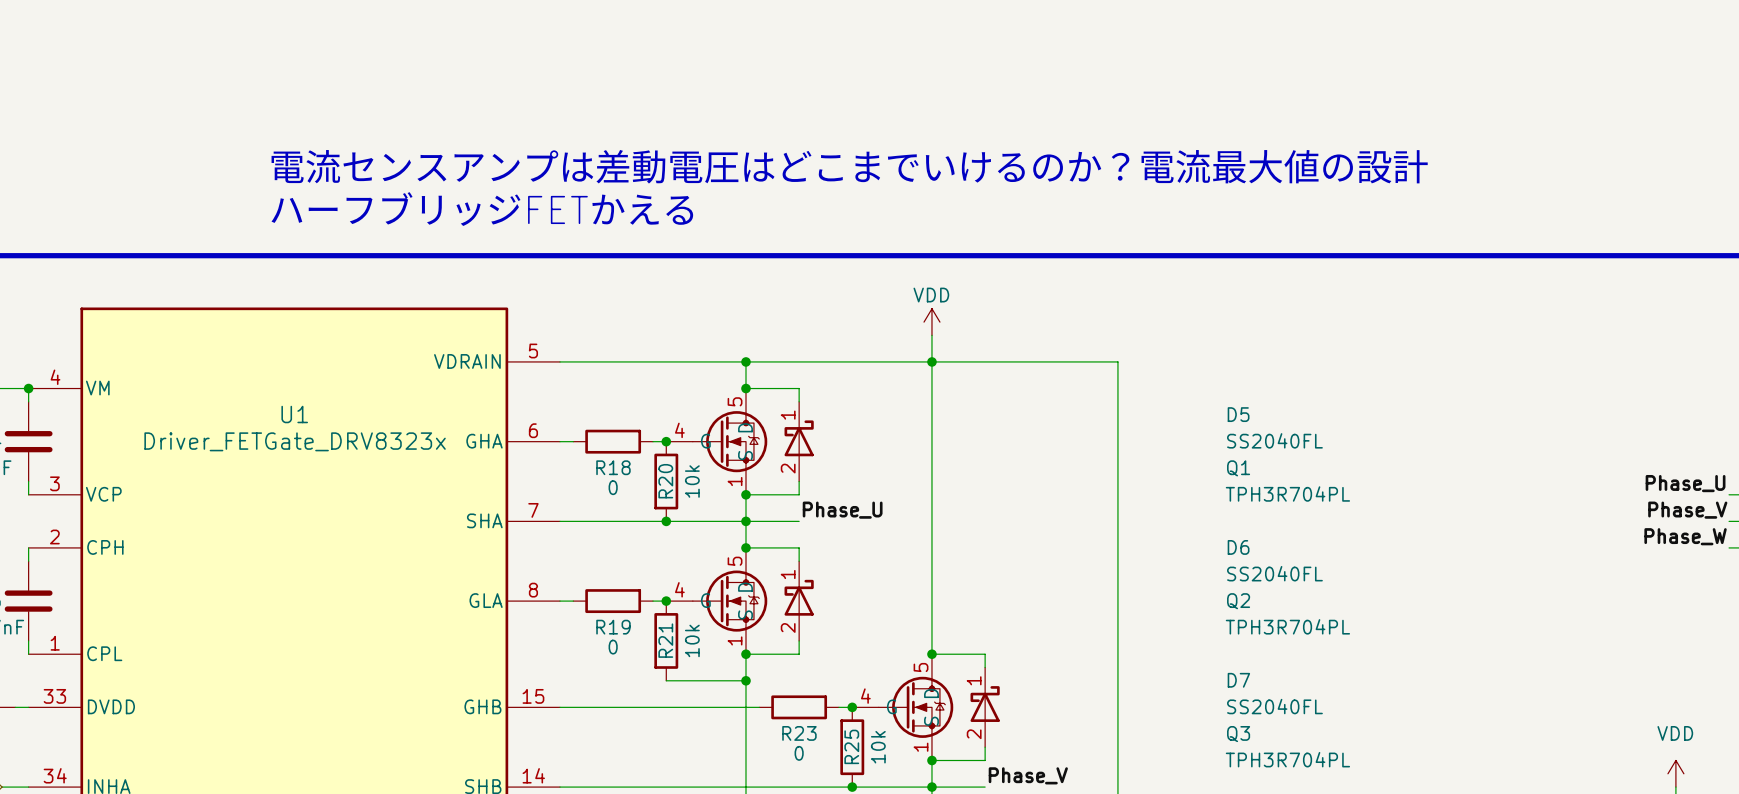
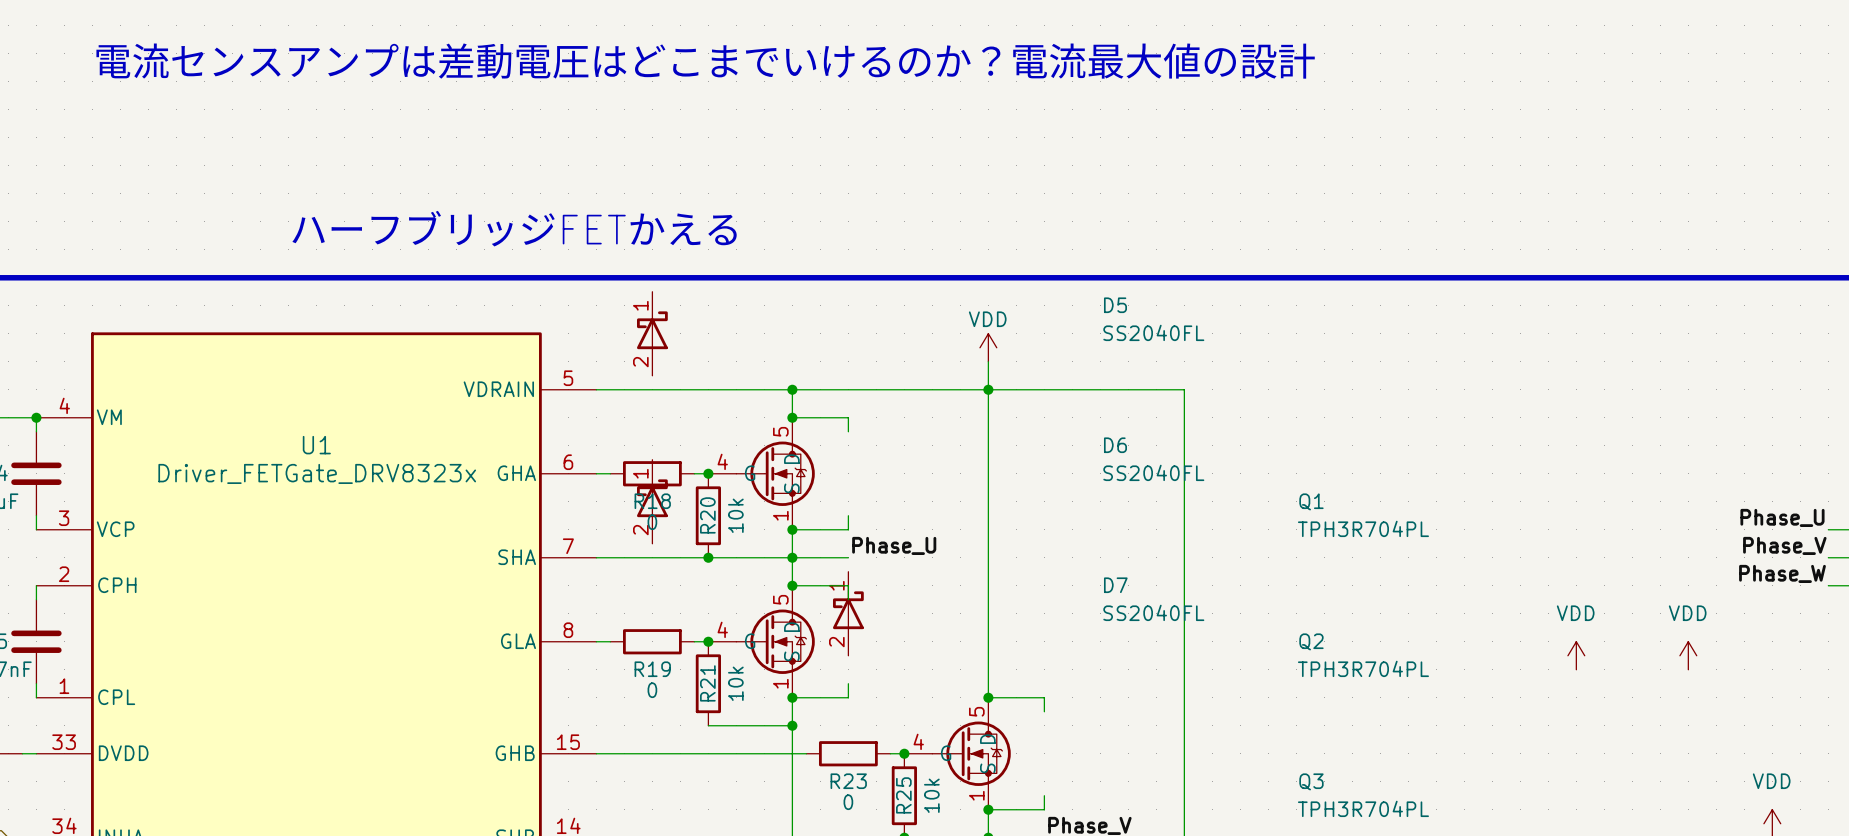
text position: 電流センスアンプは差動電圧はどこまでいけるのか？電流最大値の設計 (849, 166) -> 電流センスアンプは差動電圧はどこまでいけるのか？電流最大値の設計 (705, 61)
D5 position: (799, 441) -> (652, 333)
D6 position: (799, 601) -> (652, 501)
power symbol: none -> VDD (1576, 655)
power symbol: none -> VDD (1688, 655)
D7 position: (985, 707) -> (848, 613)

